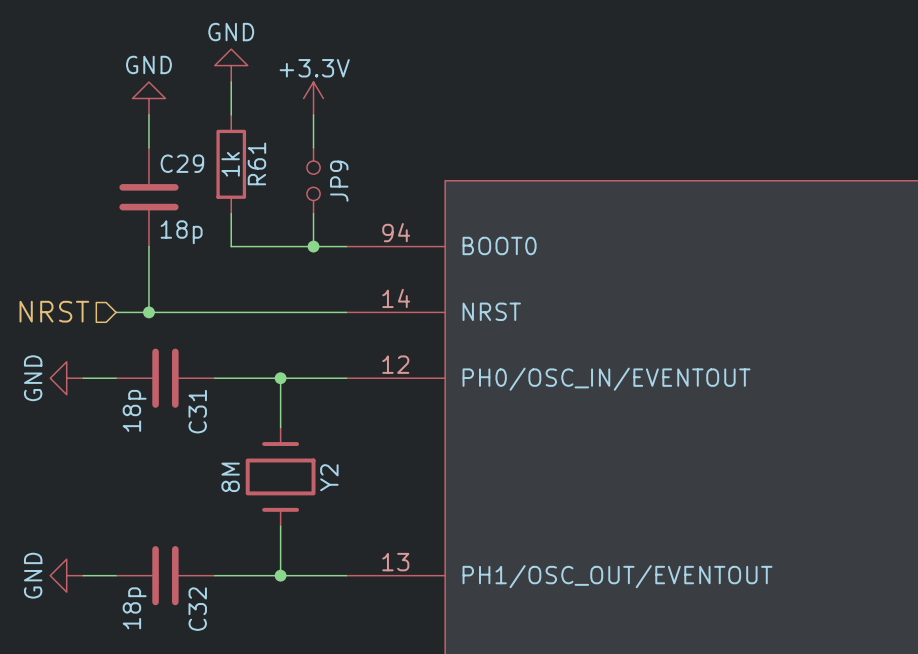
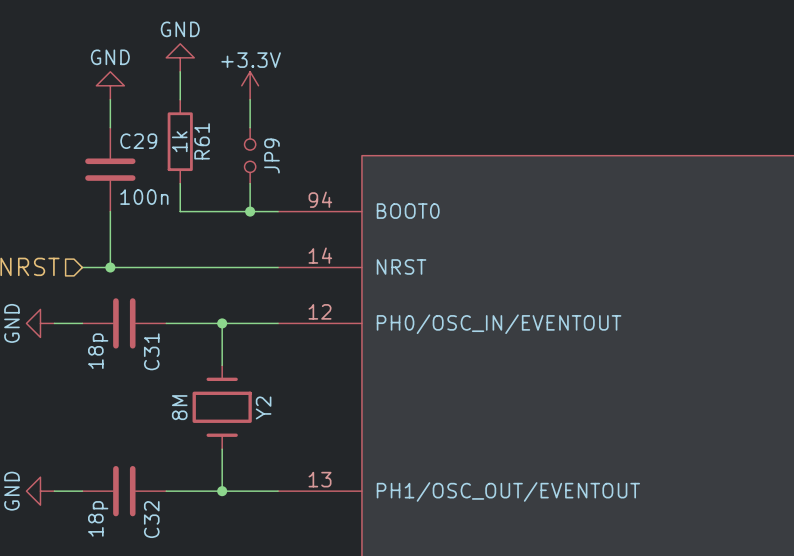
C29 value: 18p (181, 232) -> 100n (144, 197)

